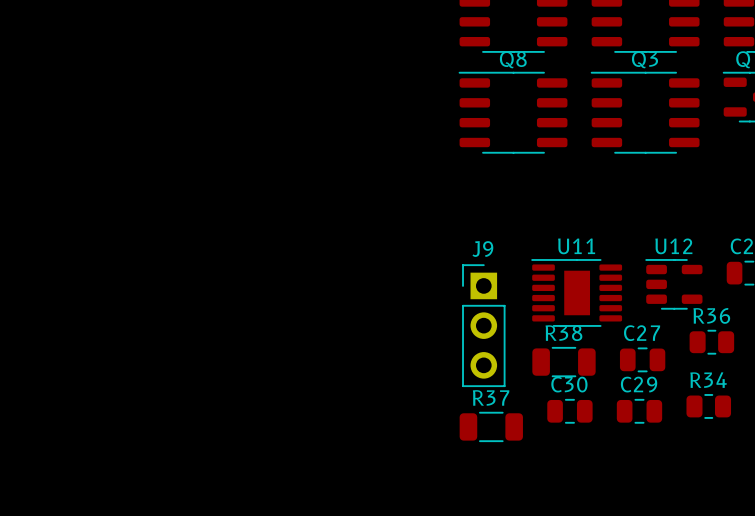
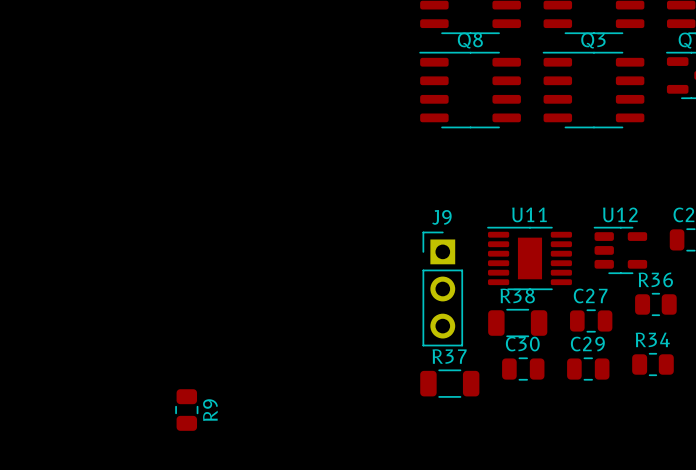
R9: none -> (186, 410)

